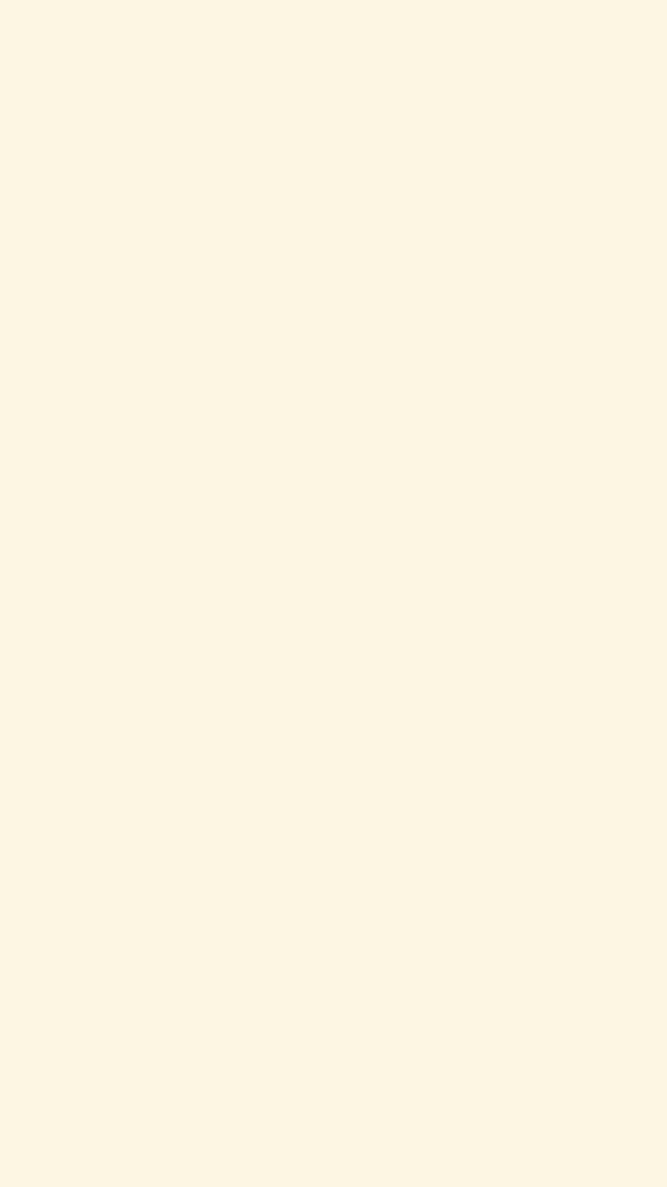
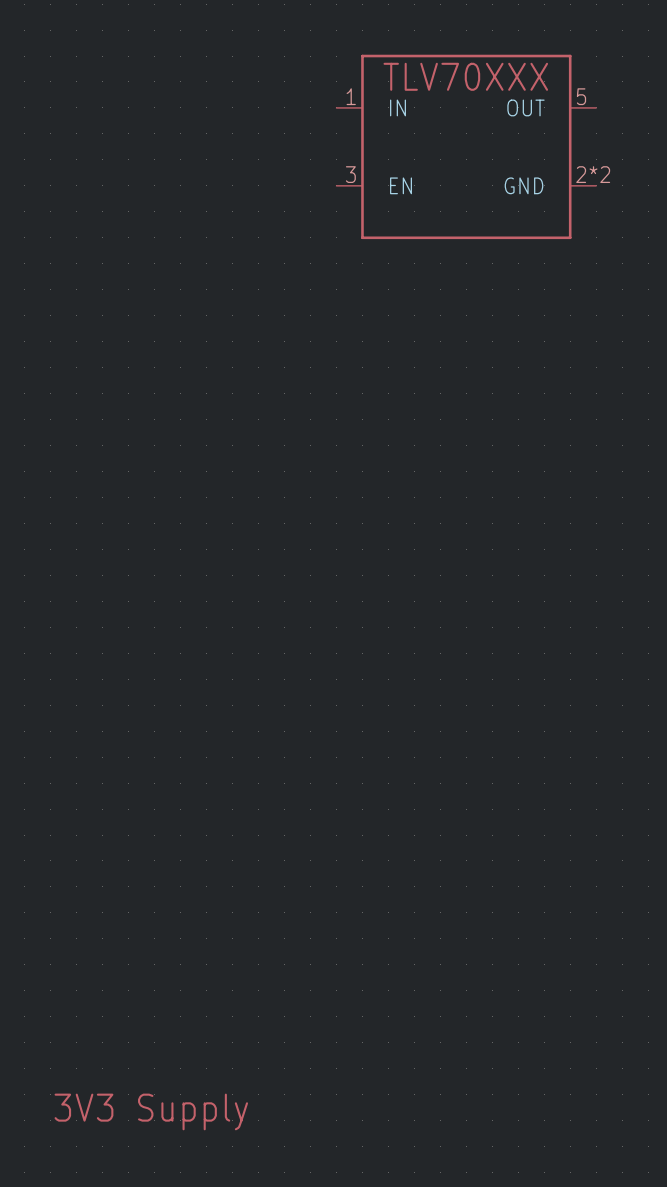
part: none -> (466, 146)
text: none -> 3V3 Supply (151, 1111)

